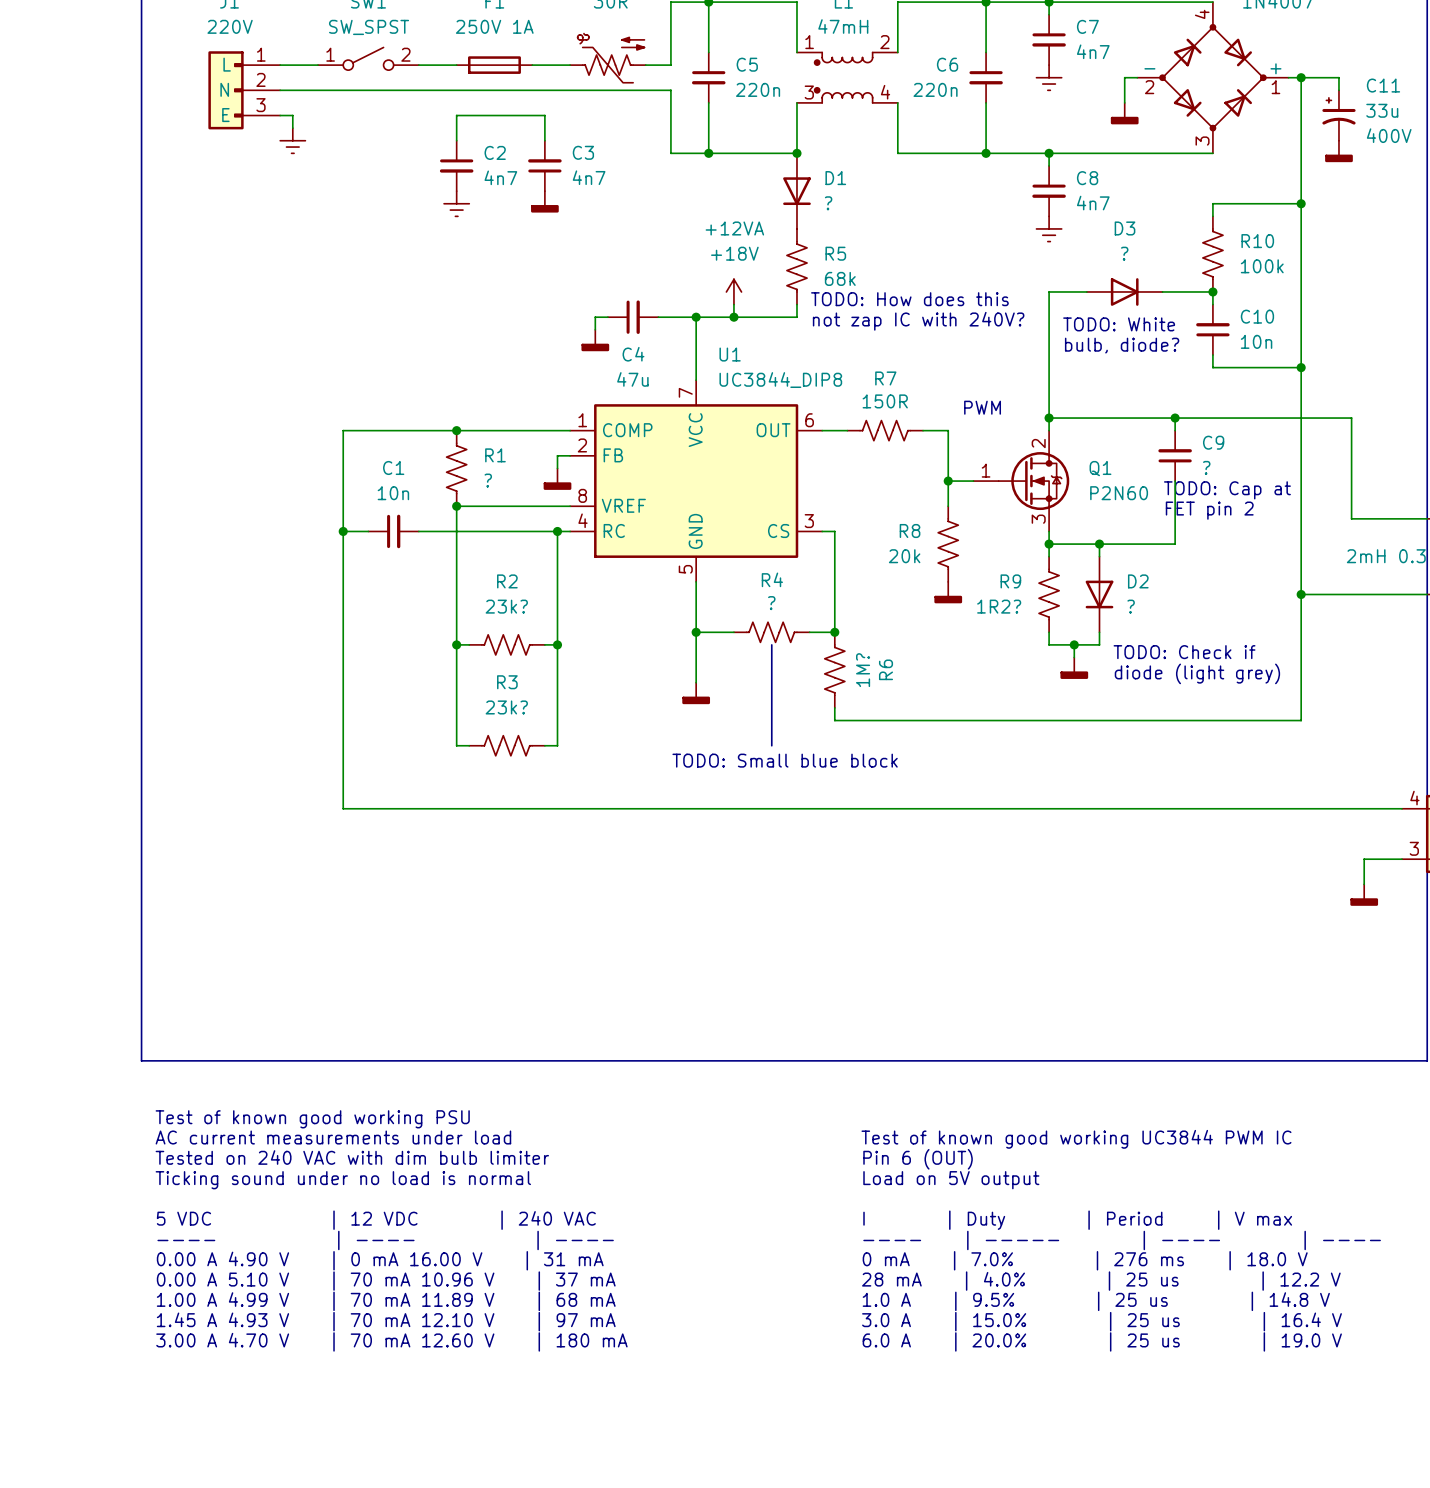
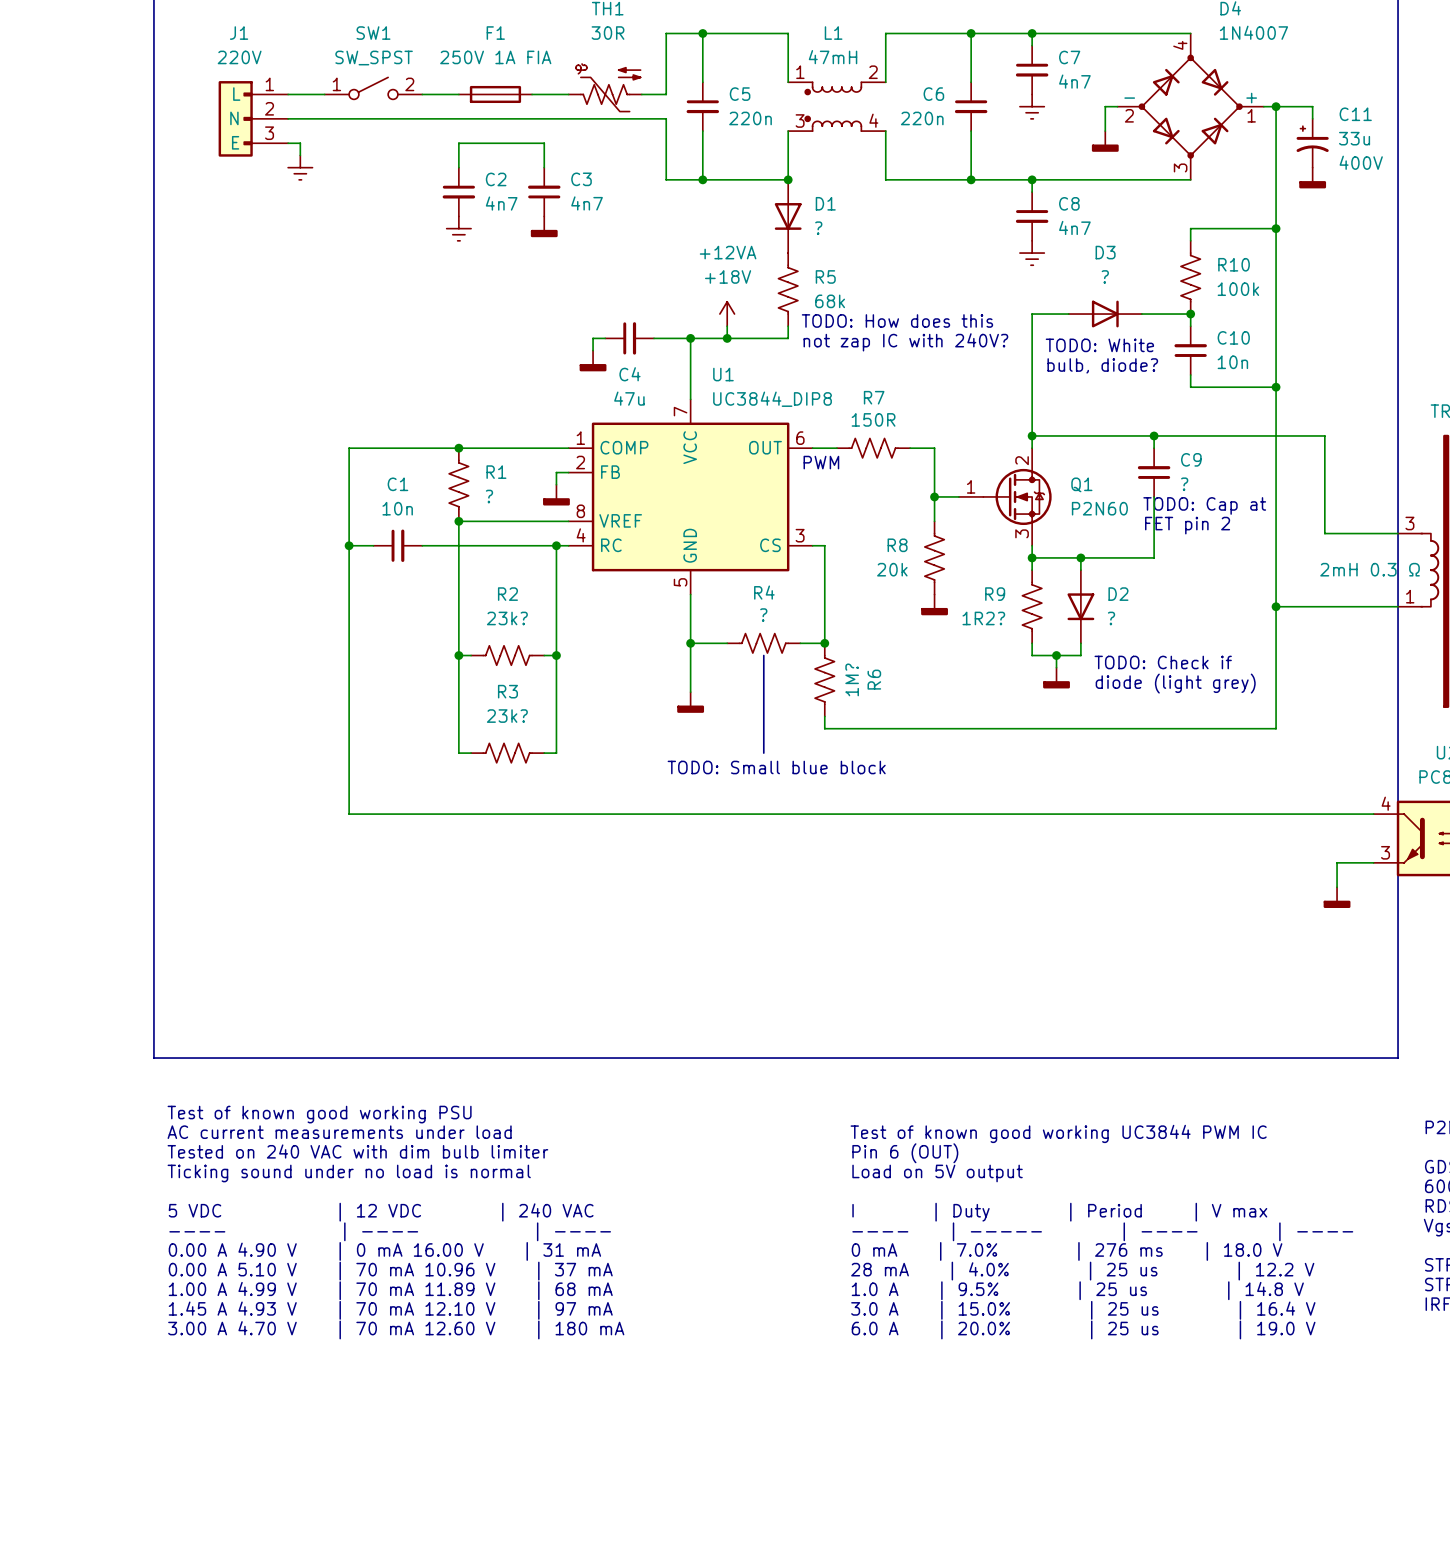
F1 value: 250V 1A (494, 26) -> 250V 1A FIA (495, 57)
text position: PWM (982, 407) -> PWM (821, 462)

